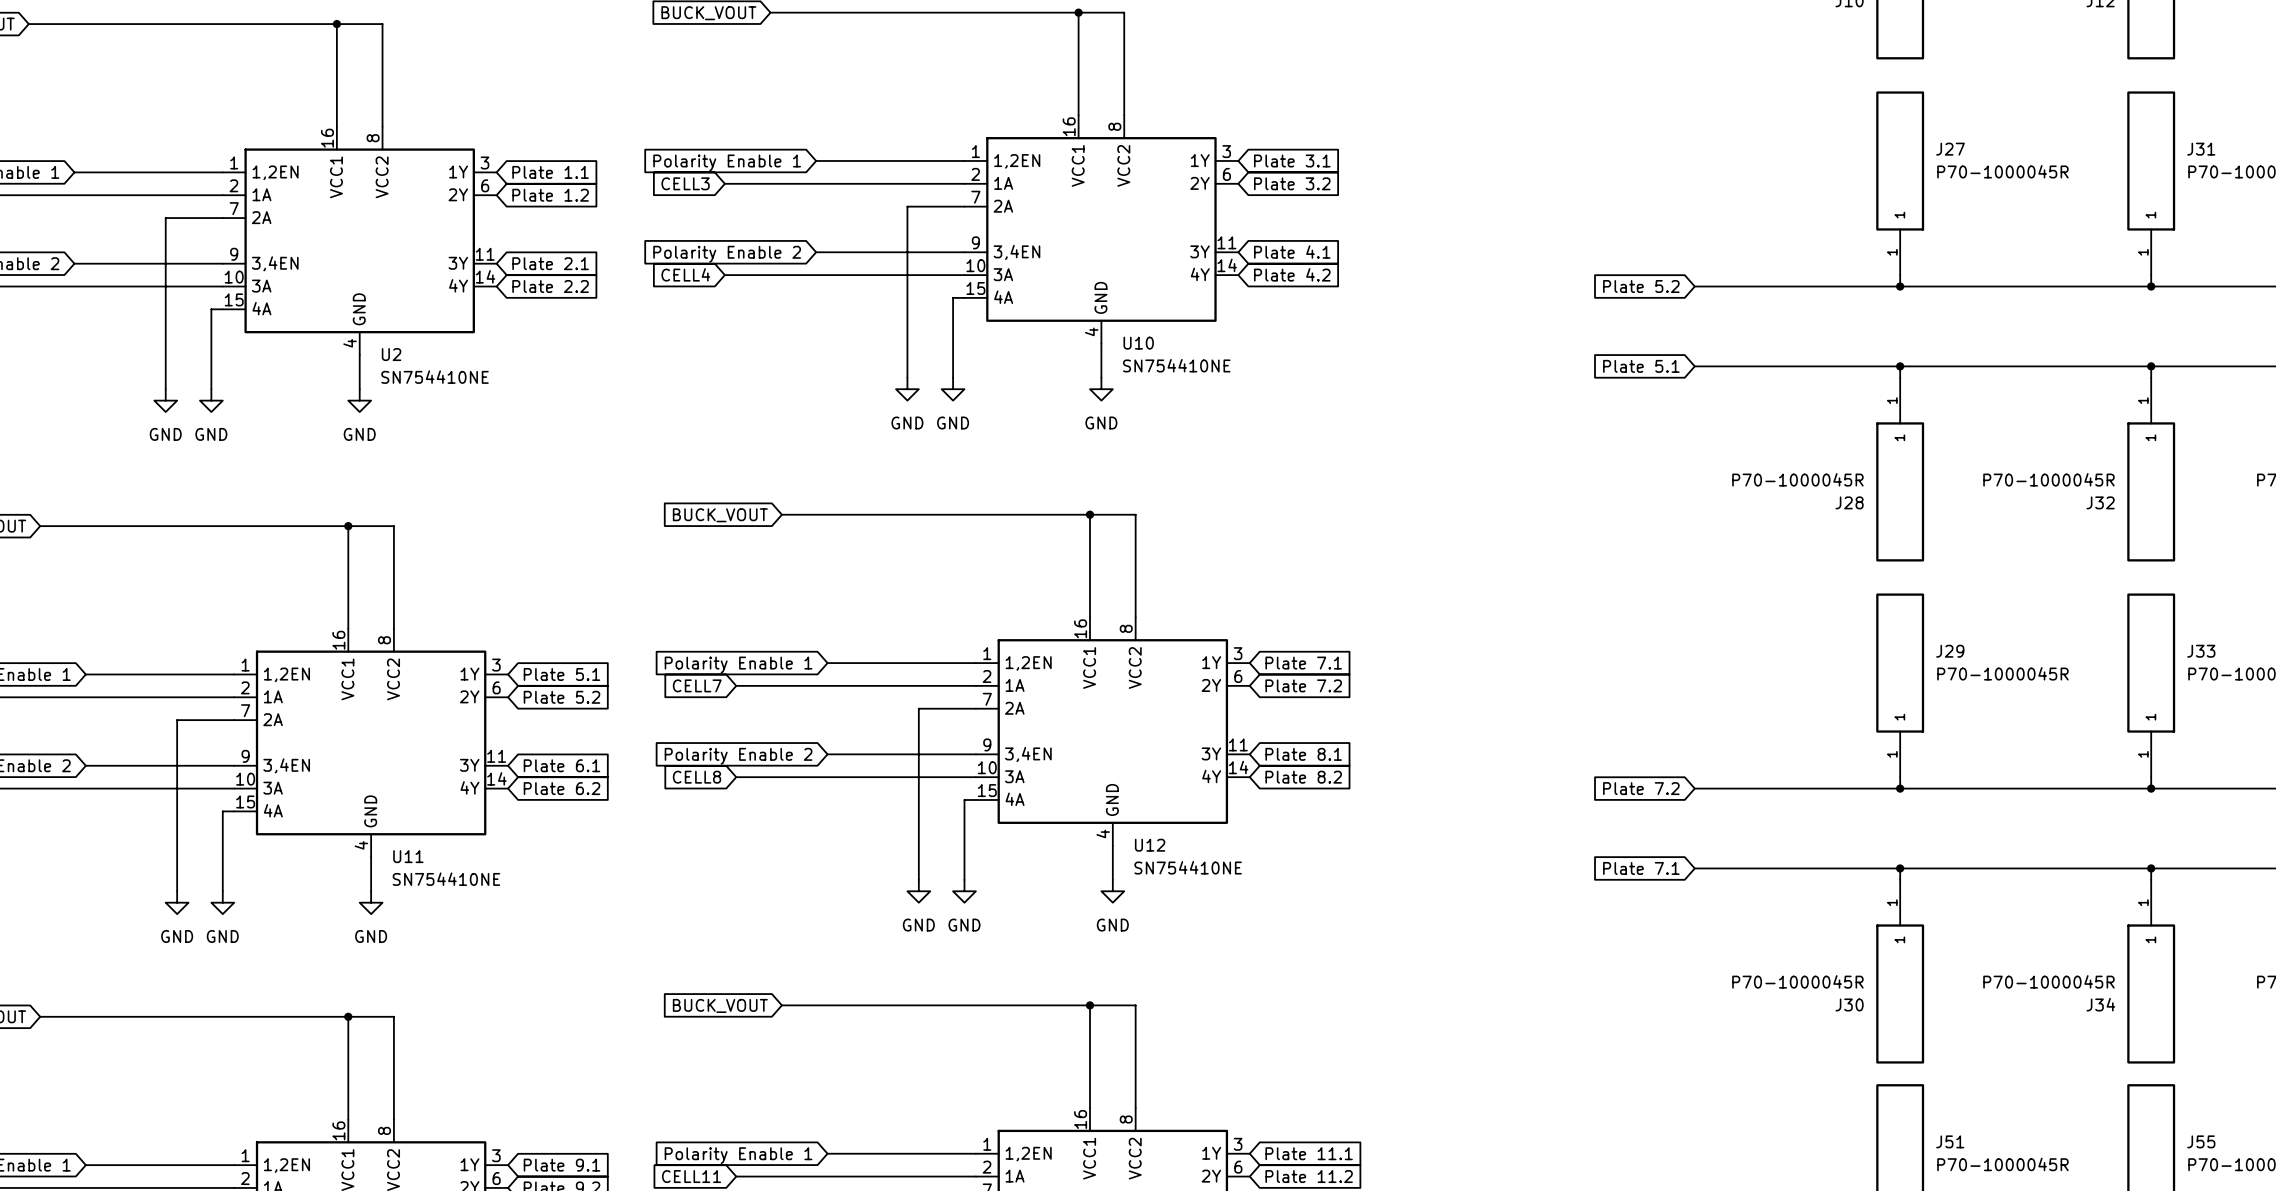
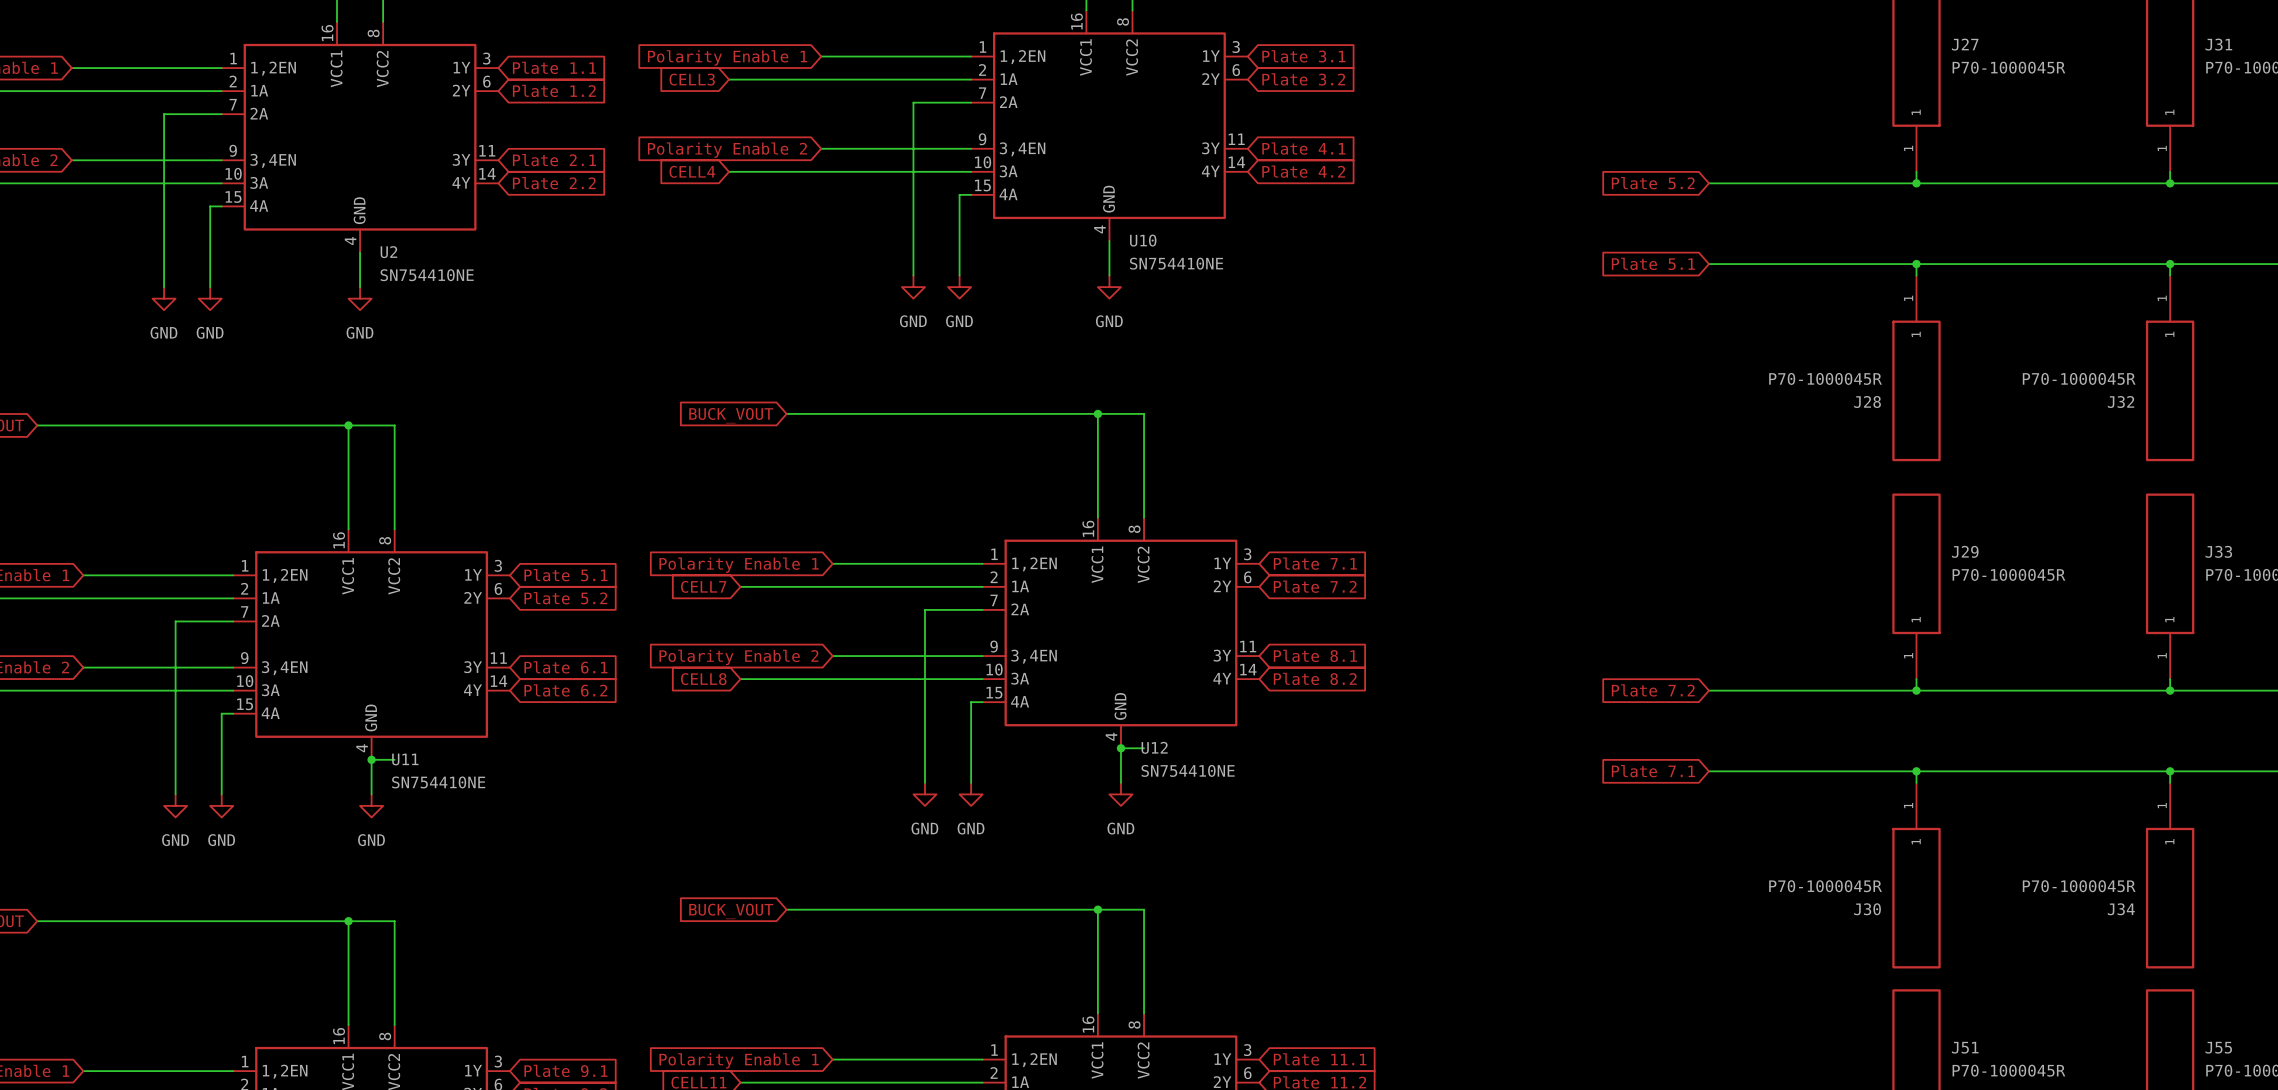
wire: none -> (1120, 748) (1144, 748)
junction: none -> (1120, 748)
wire: none -> (371, 759) (394, 759)
junction: none -> (371, 759)

